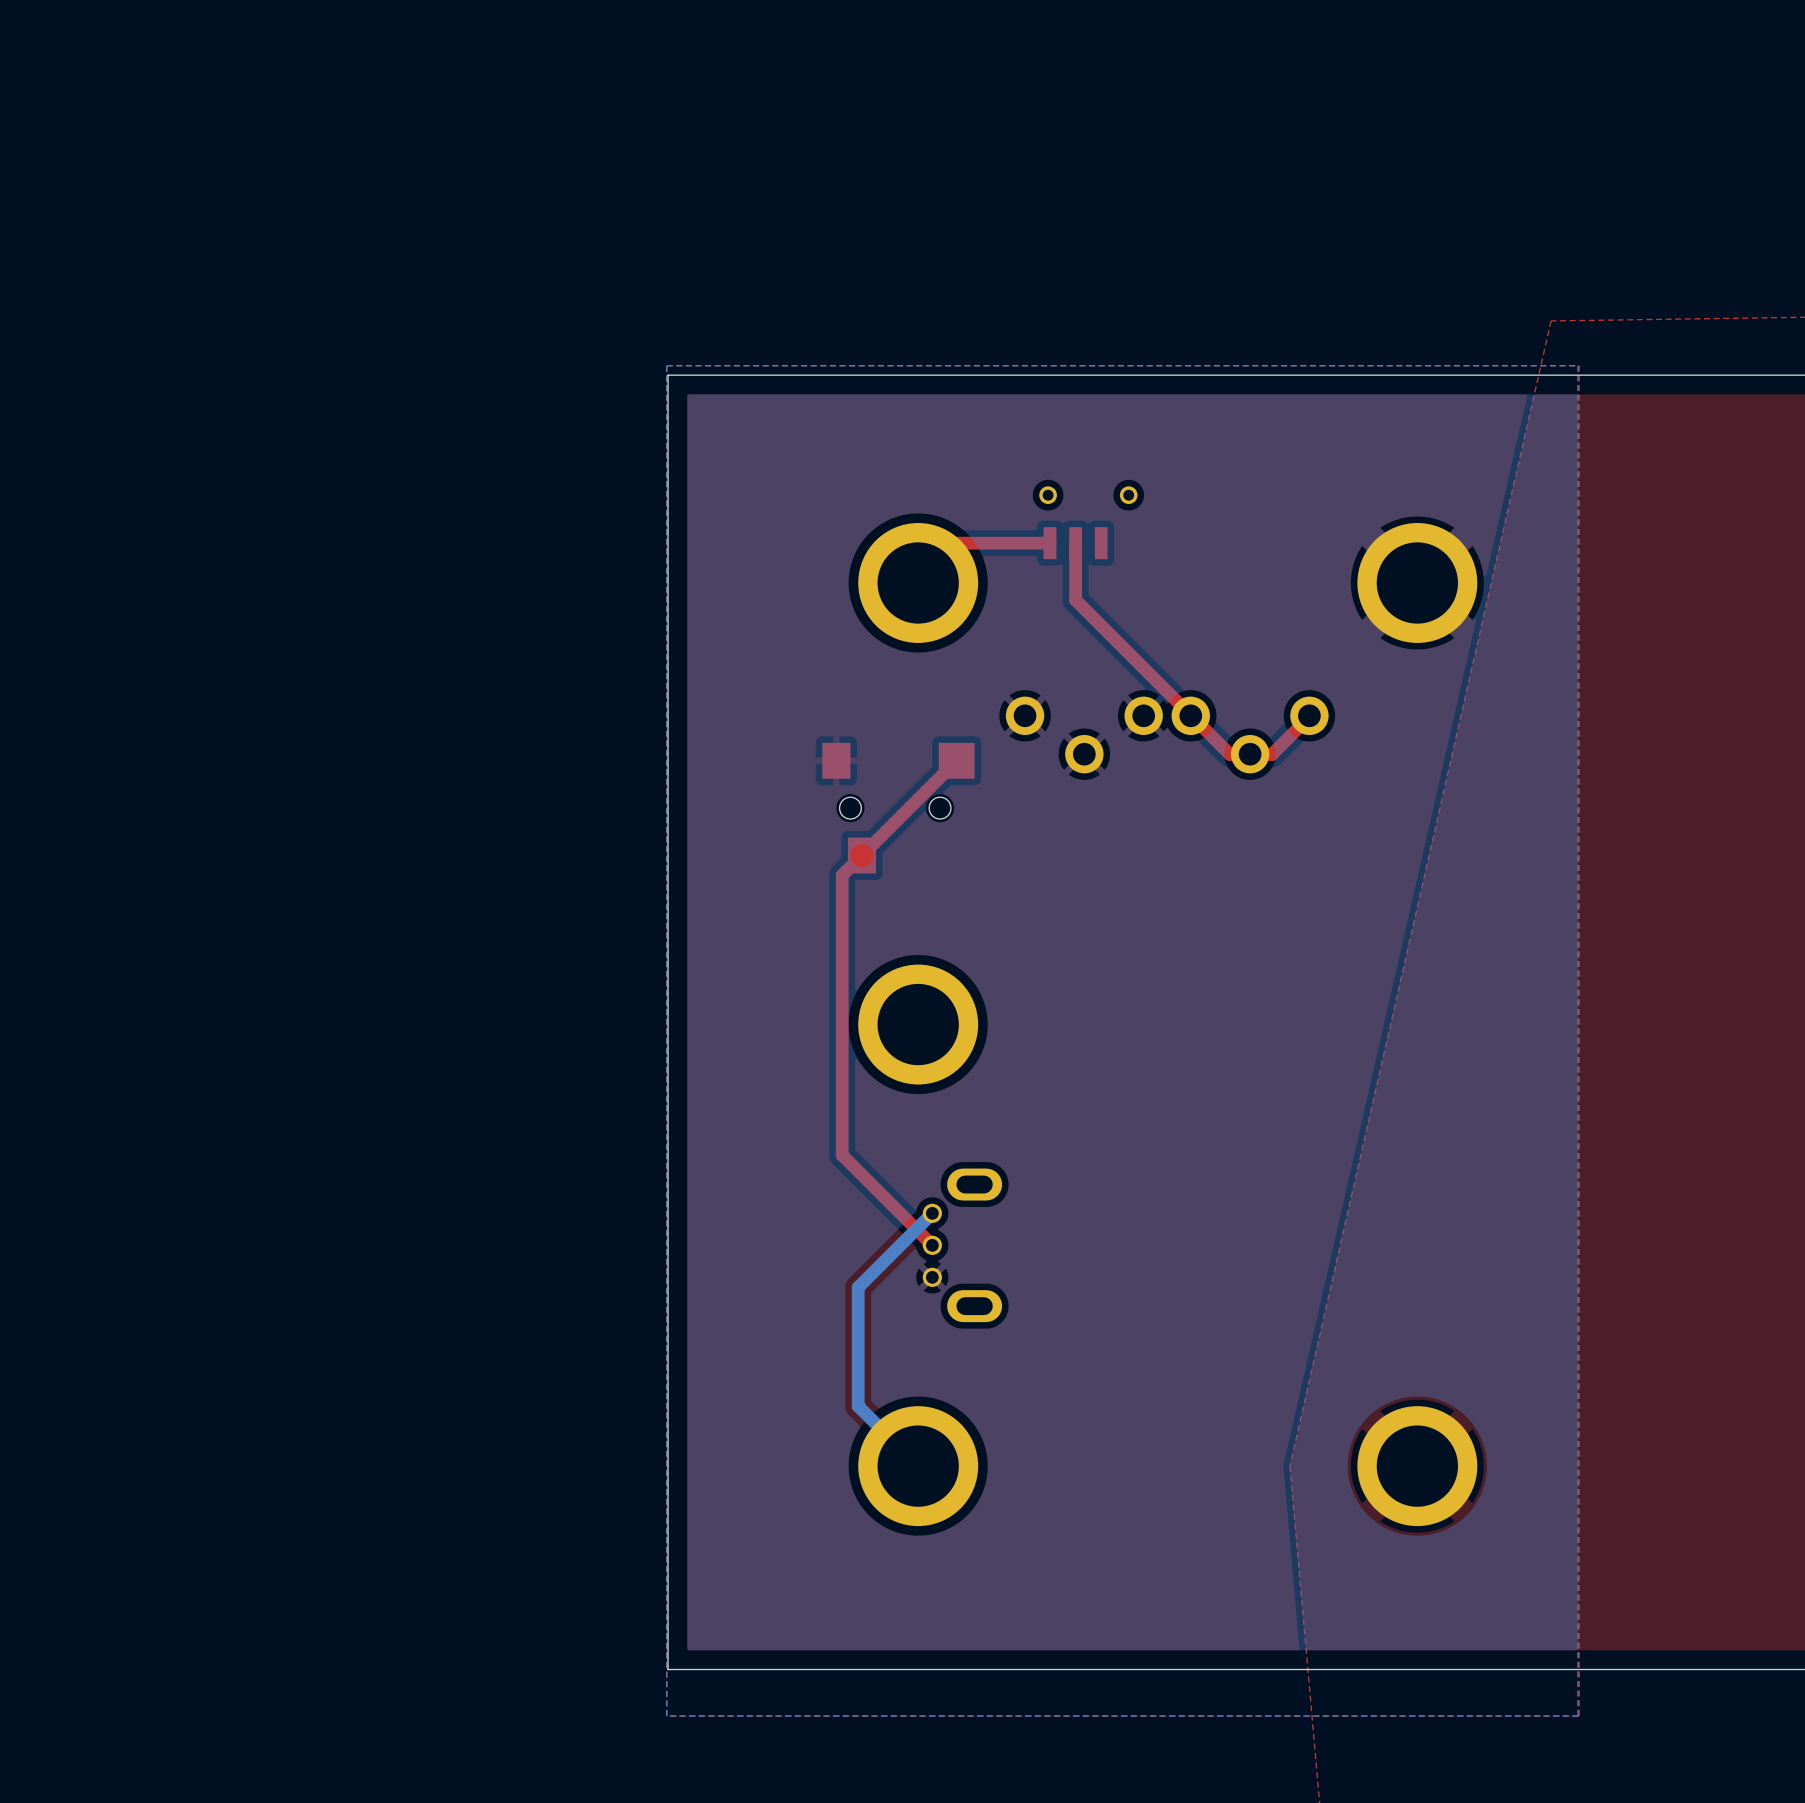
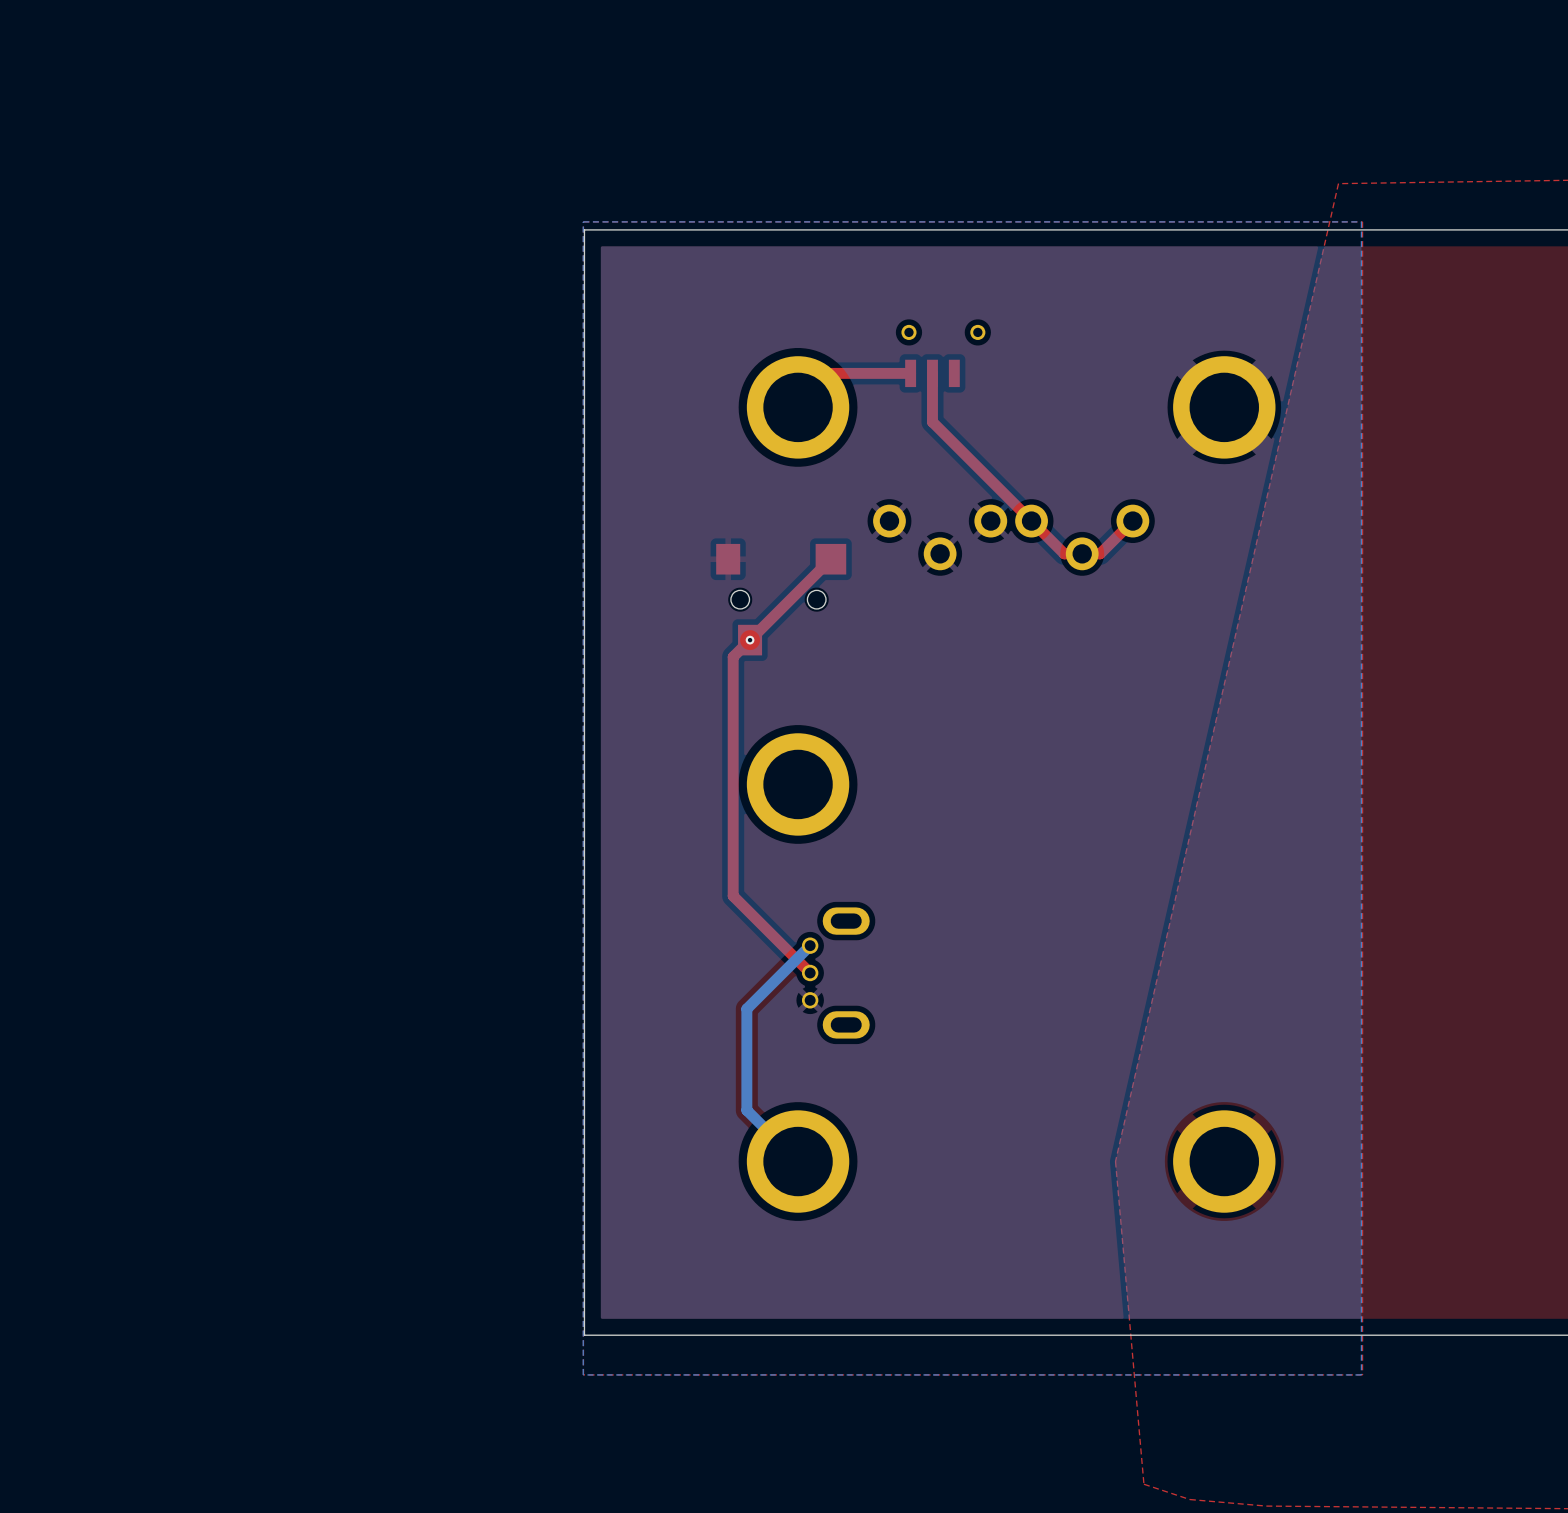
part: (1167, 734) -> none
part: none -> (940, 537)
part: none -> (1082, 537)
via: none -> (750, 640)

